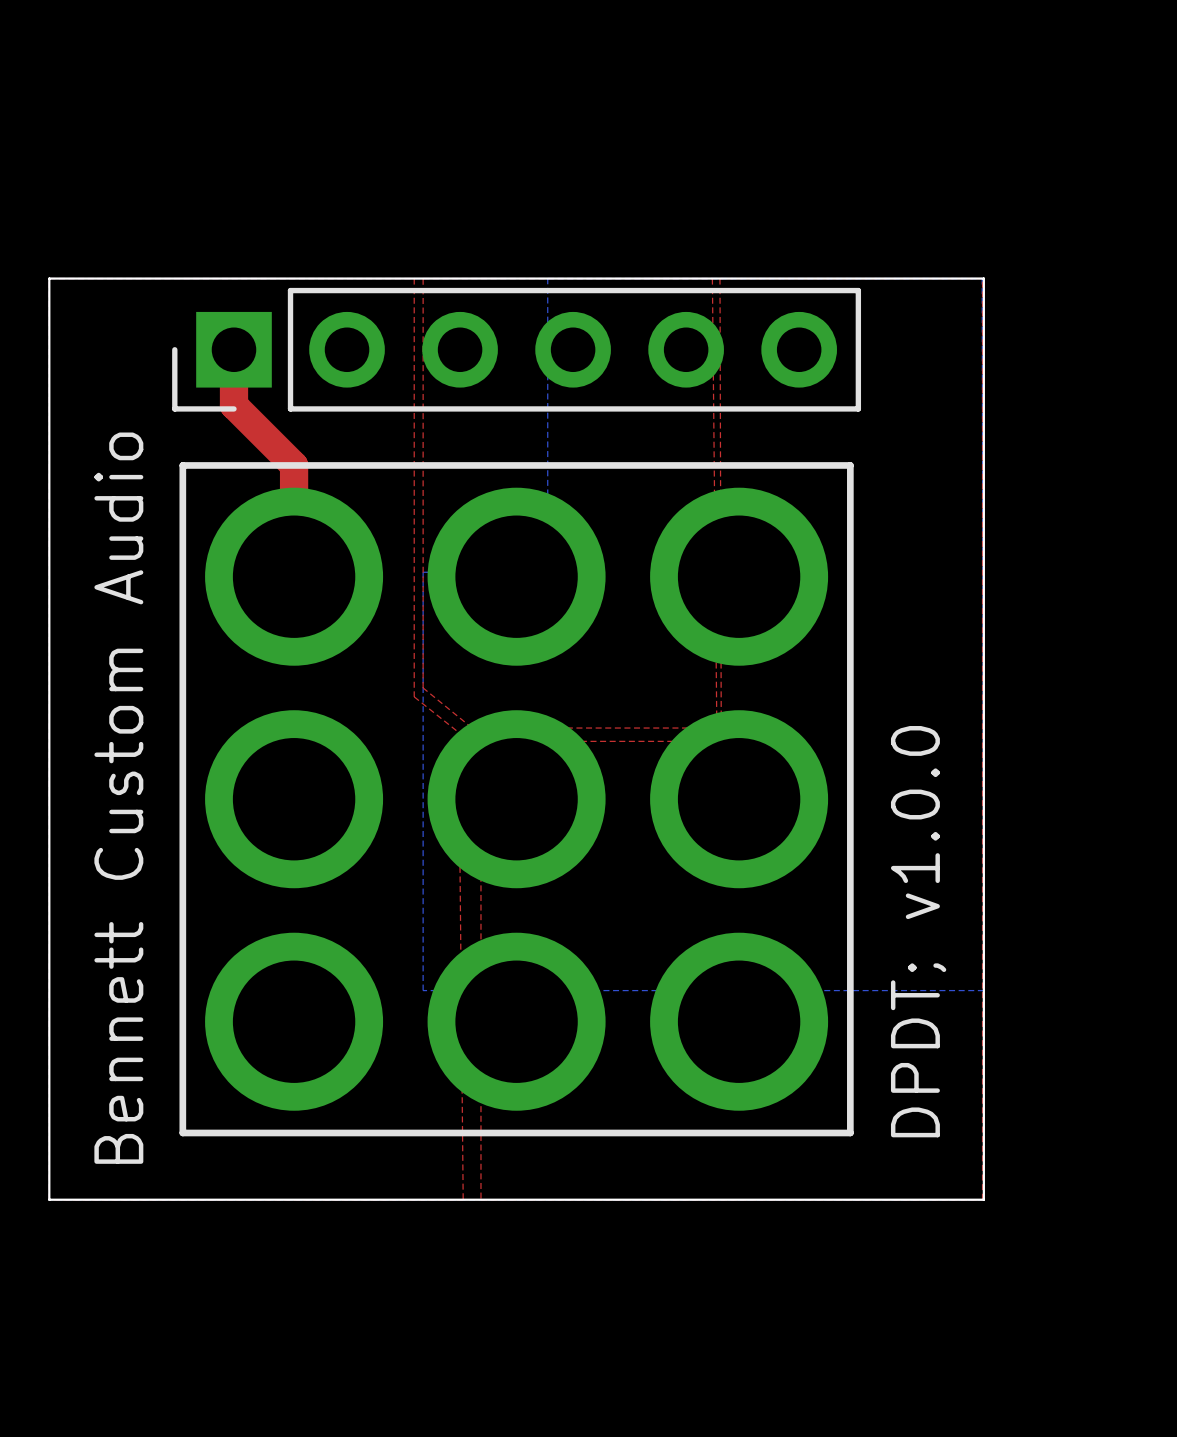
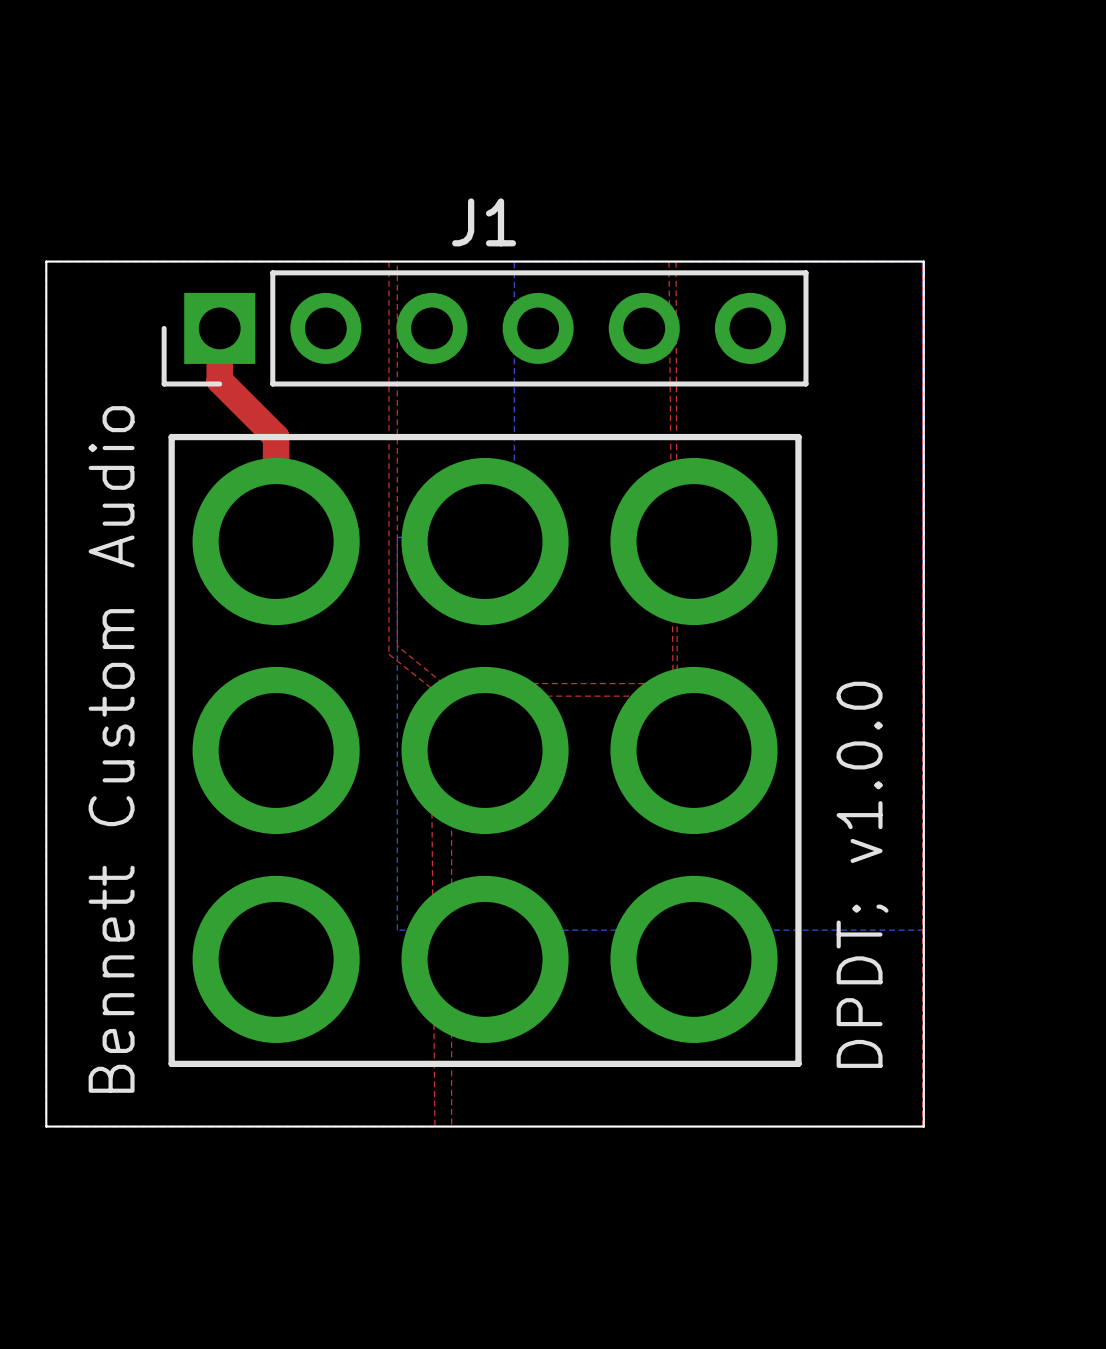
J1 name: none -> J1 (484, 222)

